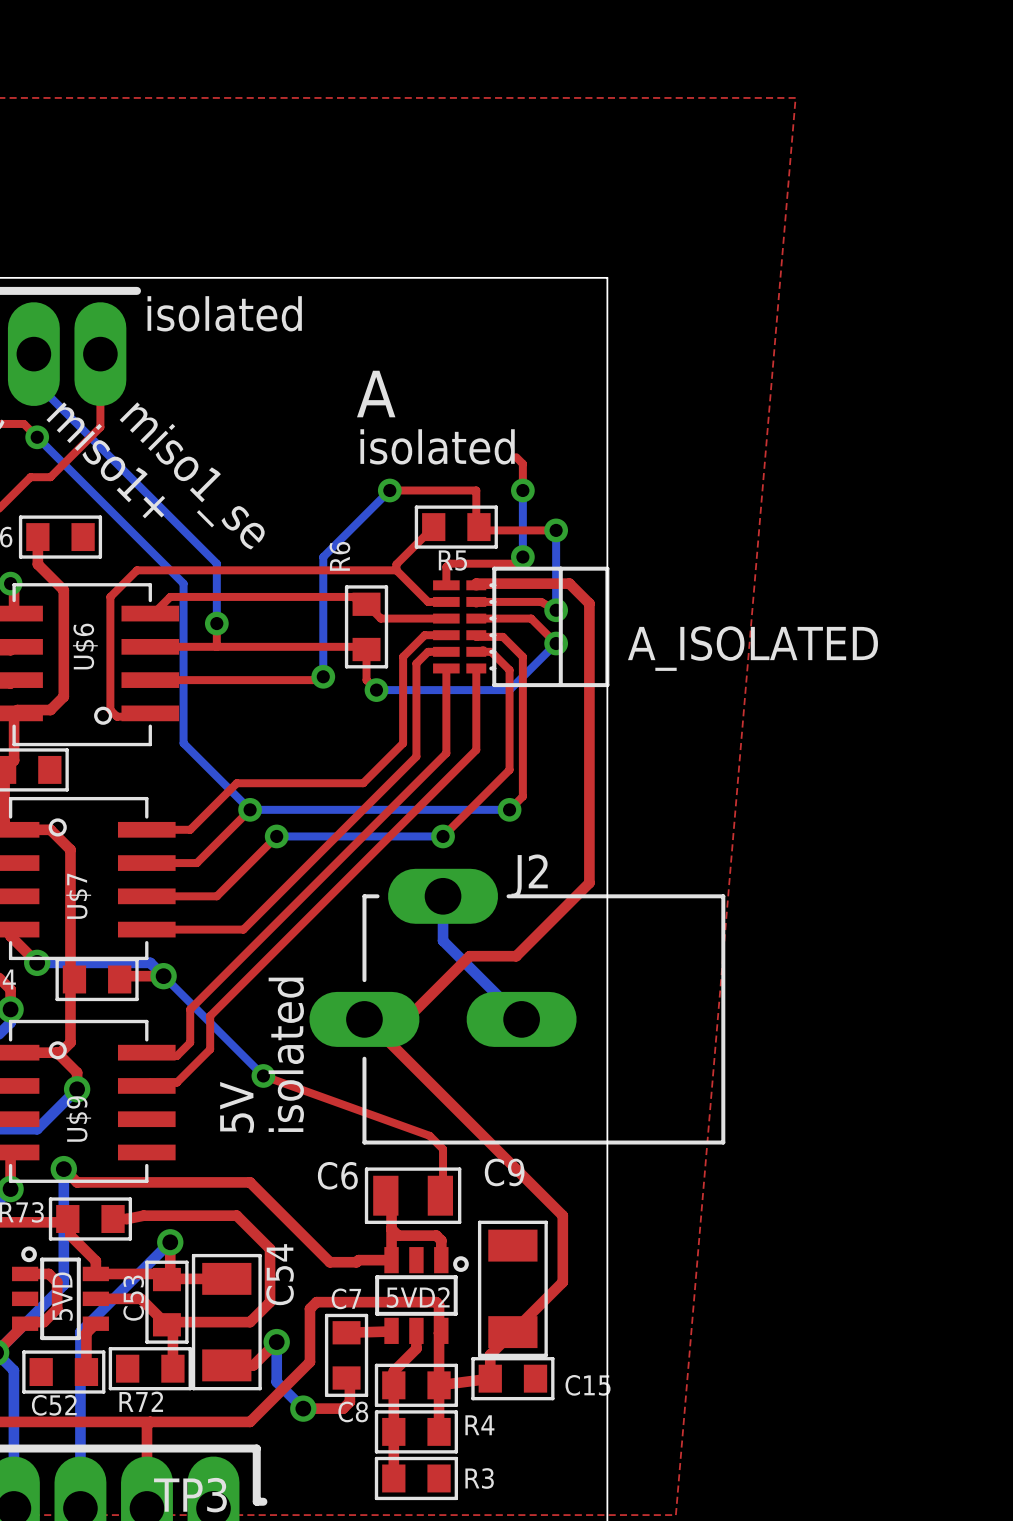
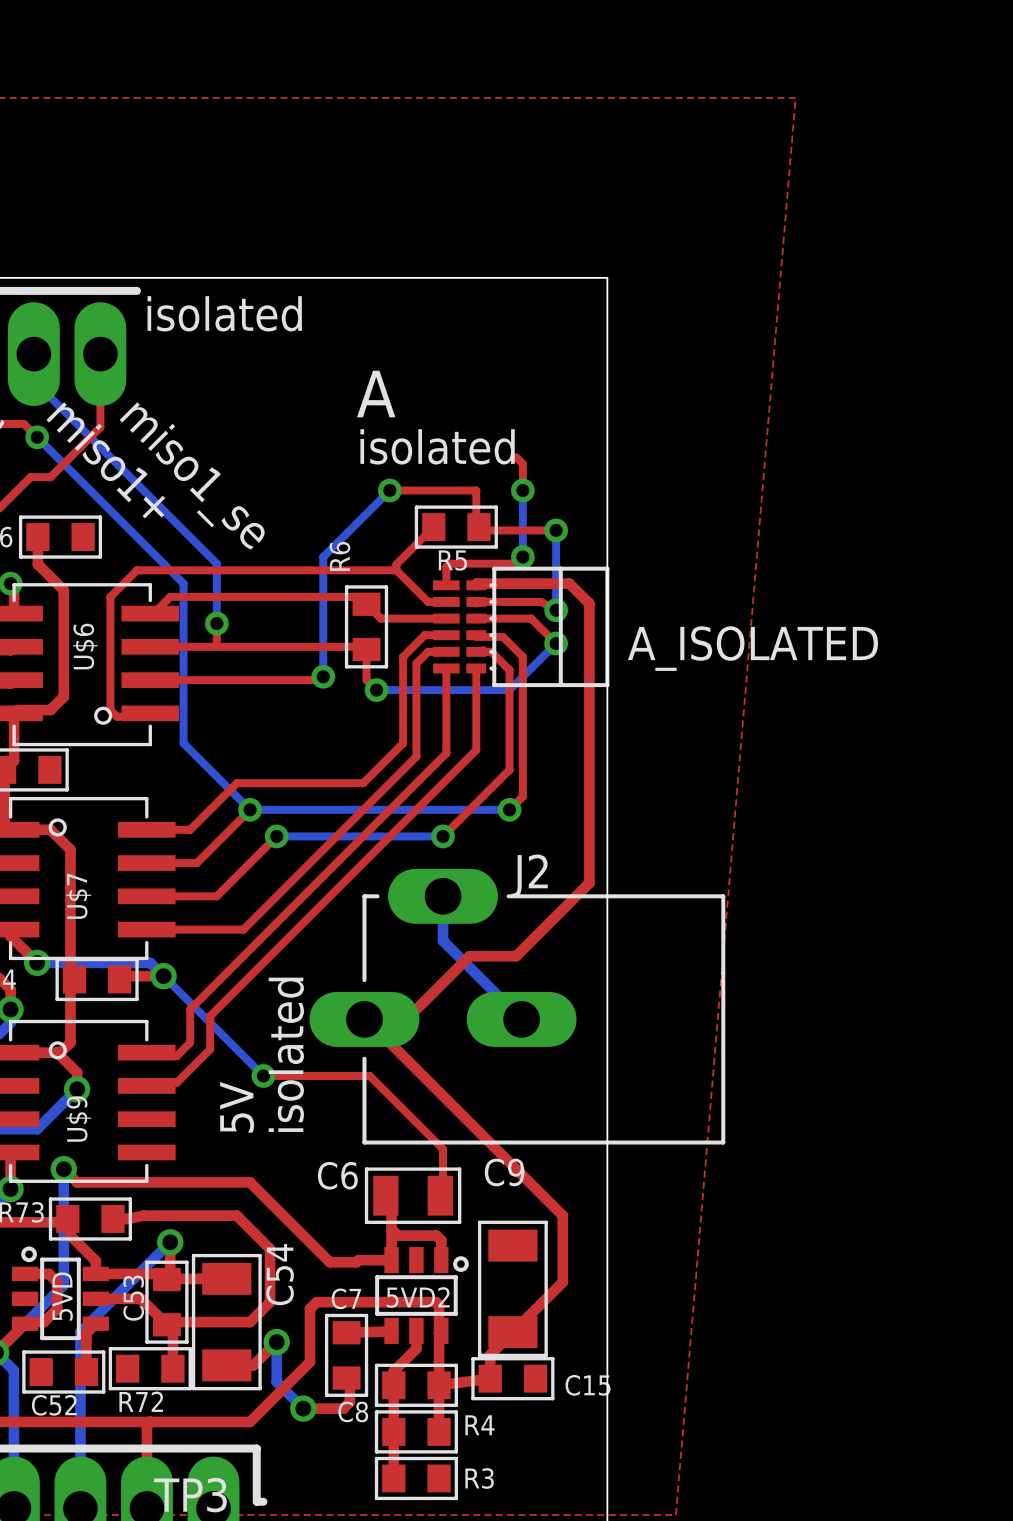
top track: (263, 1075) (429, 1135) -> (263, 1075) (369, 1075) (429, 1135)

